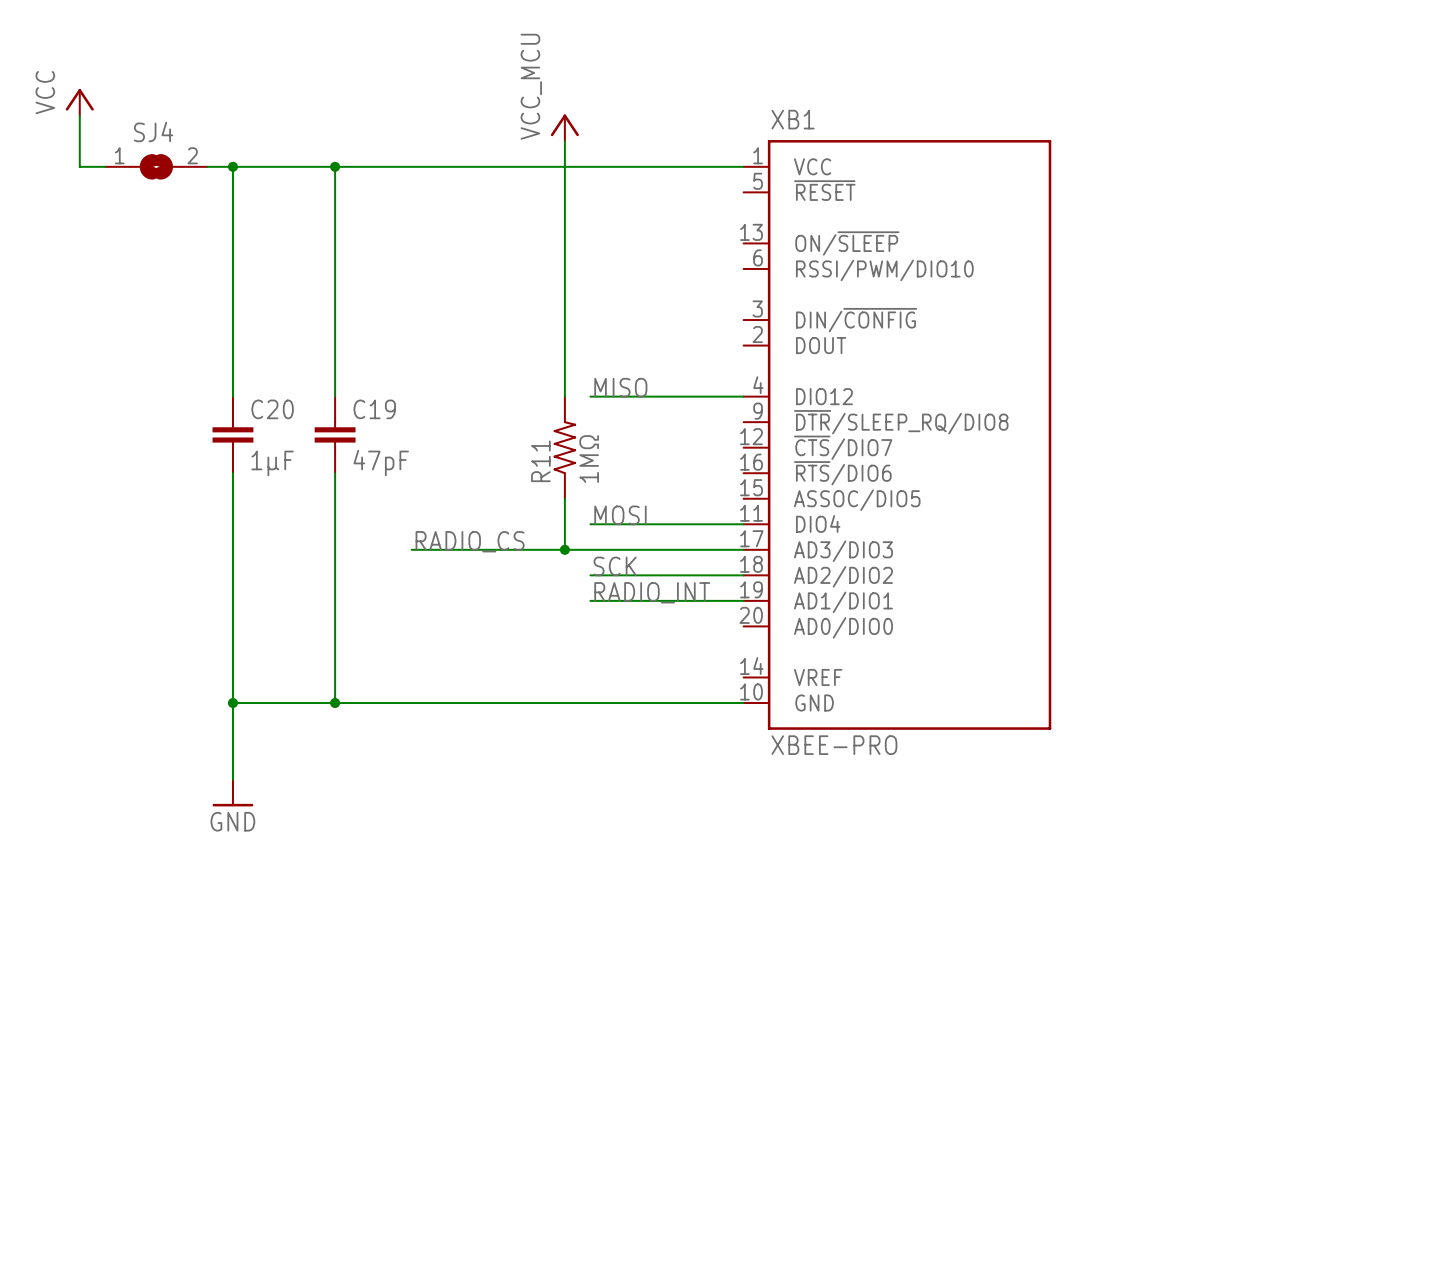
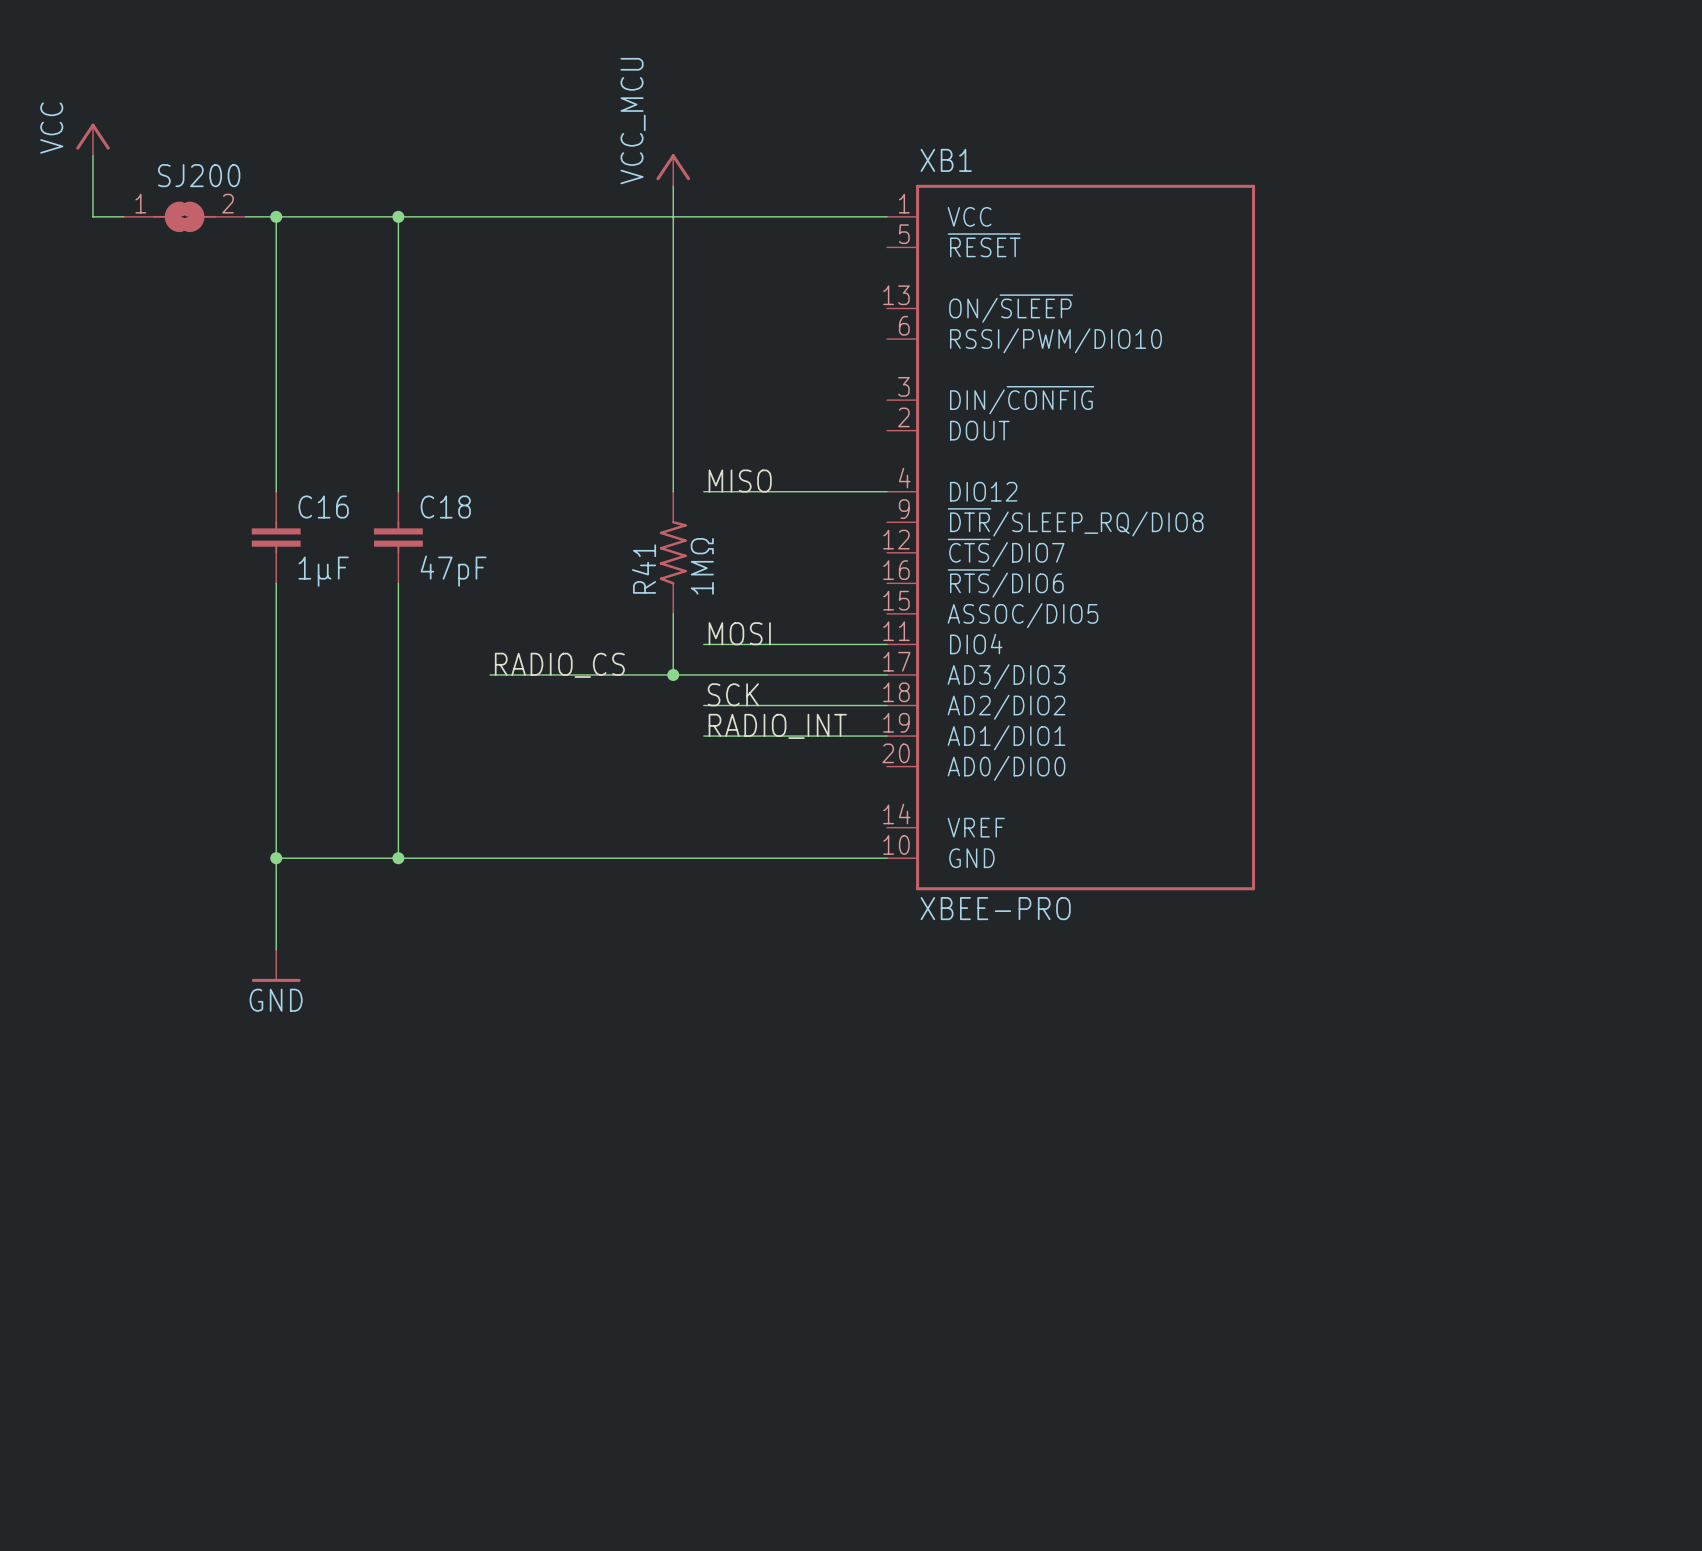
SJ4 name: SJ4 (153, 131) -> SJ200 (199, 175)
C20 name: C20 (272, 409) -> C16 (323, 507)
C19 name: C19 (374, 409) -> C18 (445, 507)
R11 name: R11 (540, 461) -> R41 (644, 569)

